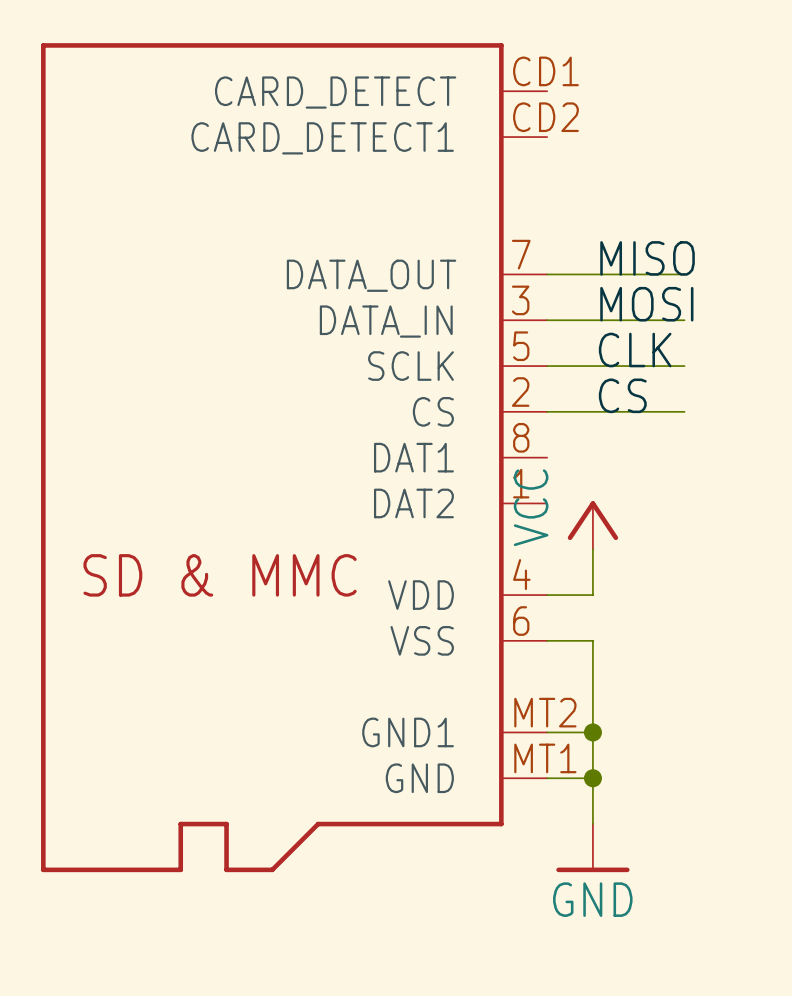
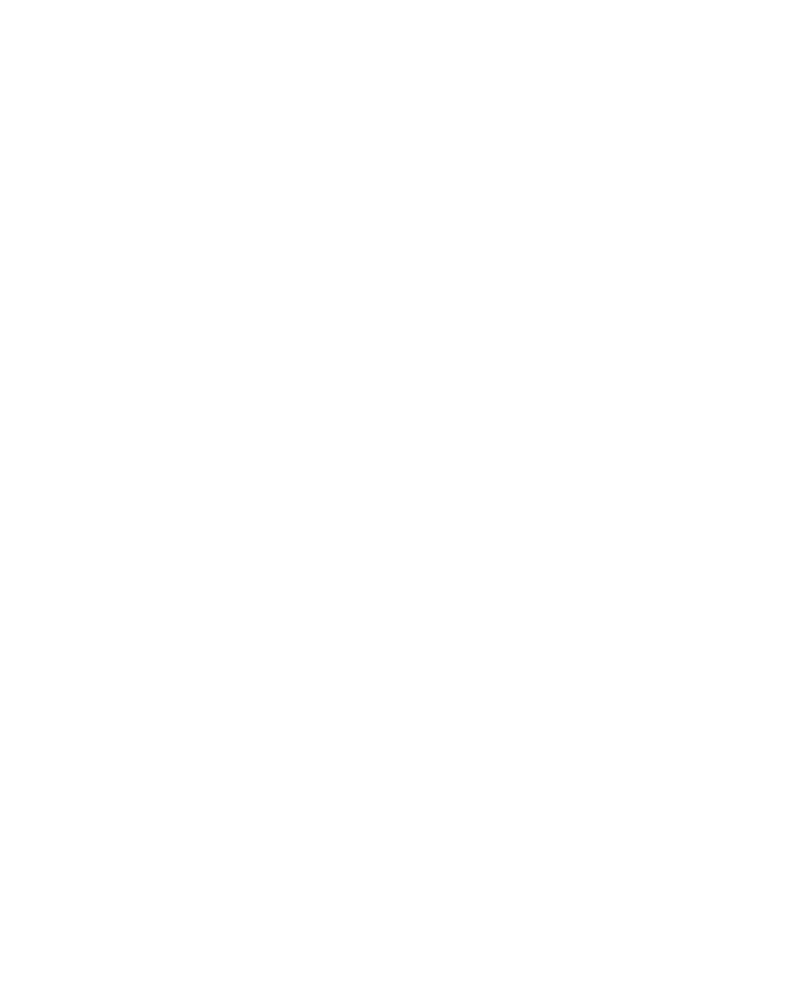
label: MISO (647, 258) -> none
wire: (547, 274) (684, 274) -> none
label: MOSI (646, 304) -> none
wire: (547, 320) (684, 320) -> none
label: CLK (635, 350) -> none
wire: (547, 366) (684, 366) -> none
label: CS (622, 395) -> none
wire: (547, 411) (684, 411) -> none
part: (294, 457) -> none
power symbol: VCC (592, 525) -> none
wire: (592, 549) (592, 595) (547, 595) -> none
wire: (547, 640) (592, 640) (592, 824) -> none
wire: (547, 732) (592, 732) -> none
junction: (592, 732) -> none
wire: (547, 778) (592, 778) -> none
junction: (592, 778) -> none
power symbol: GND (592, 848) -> none

